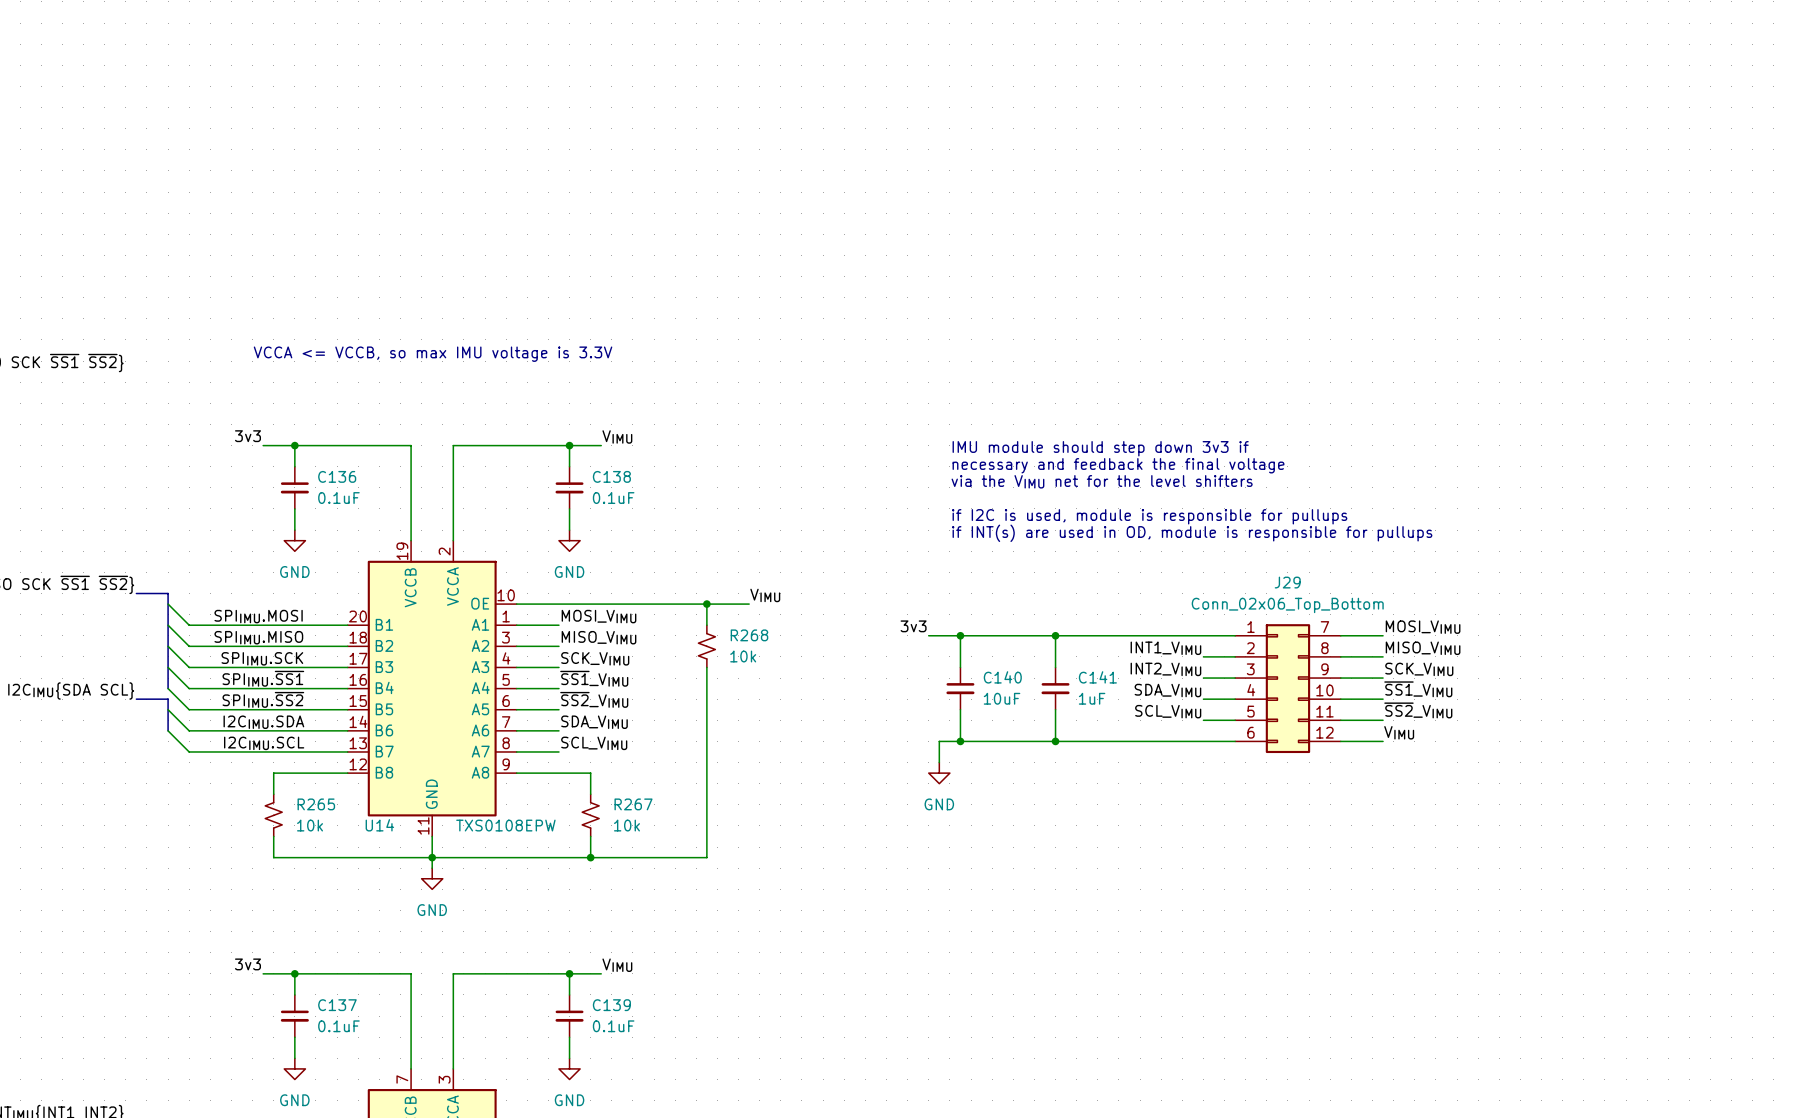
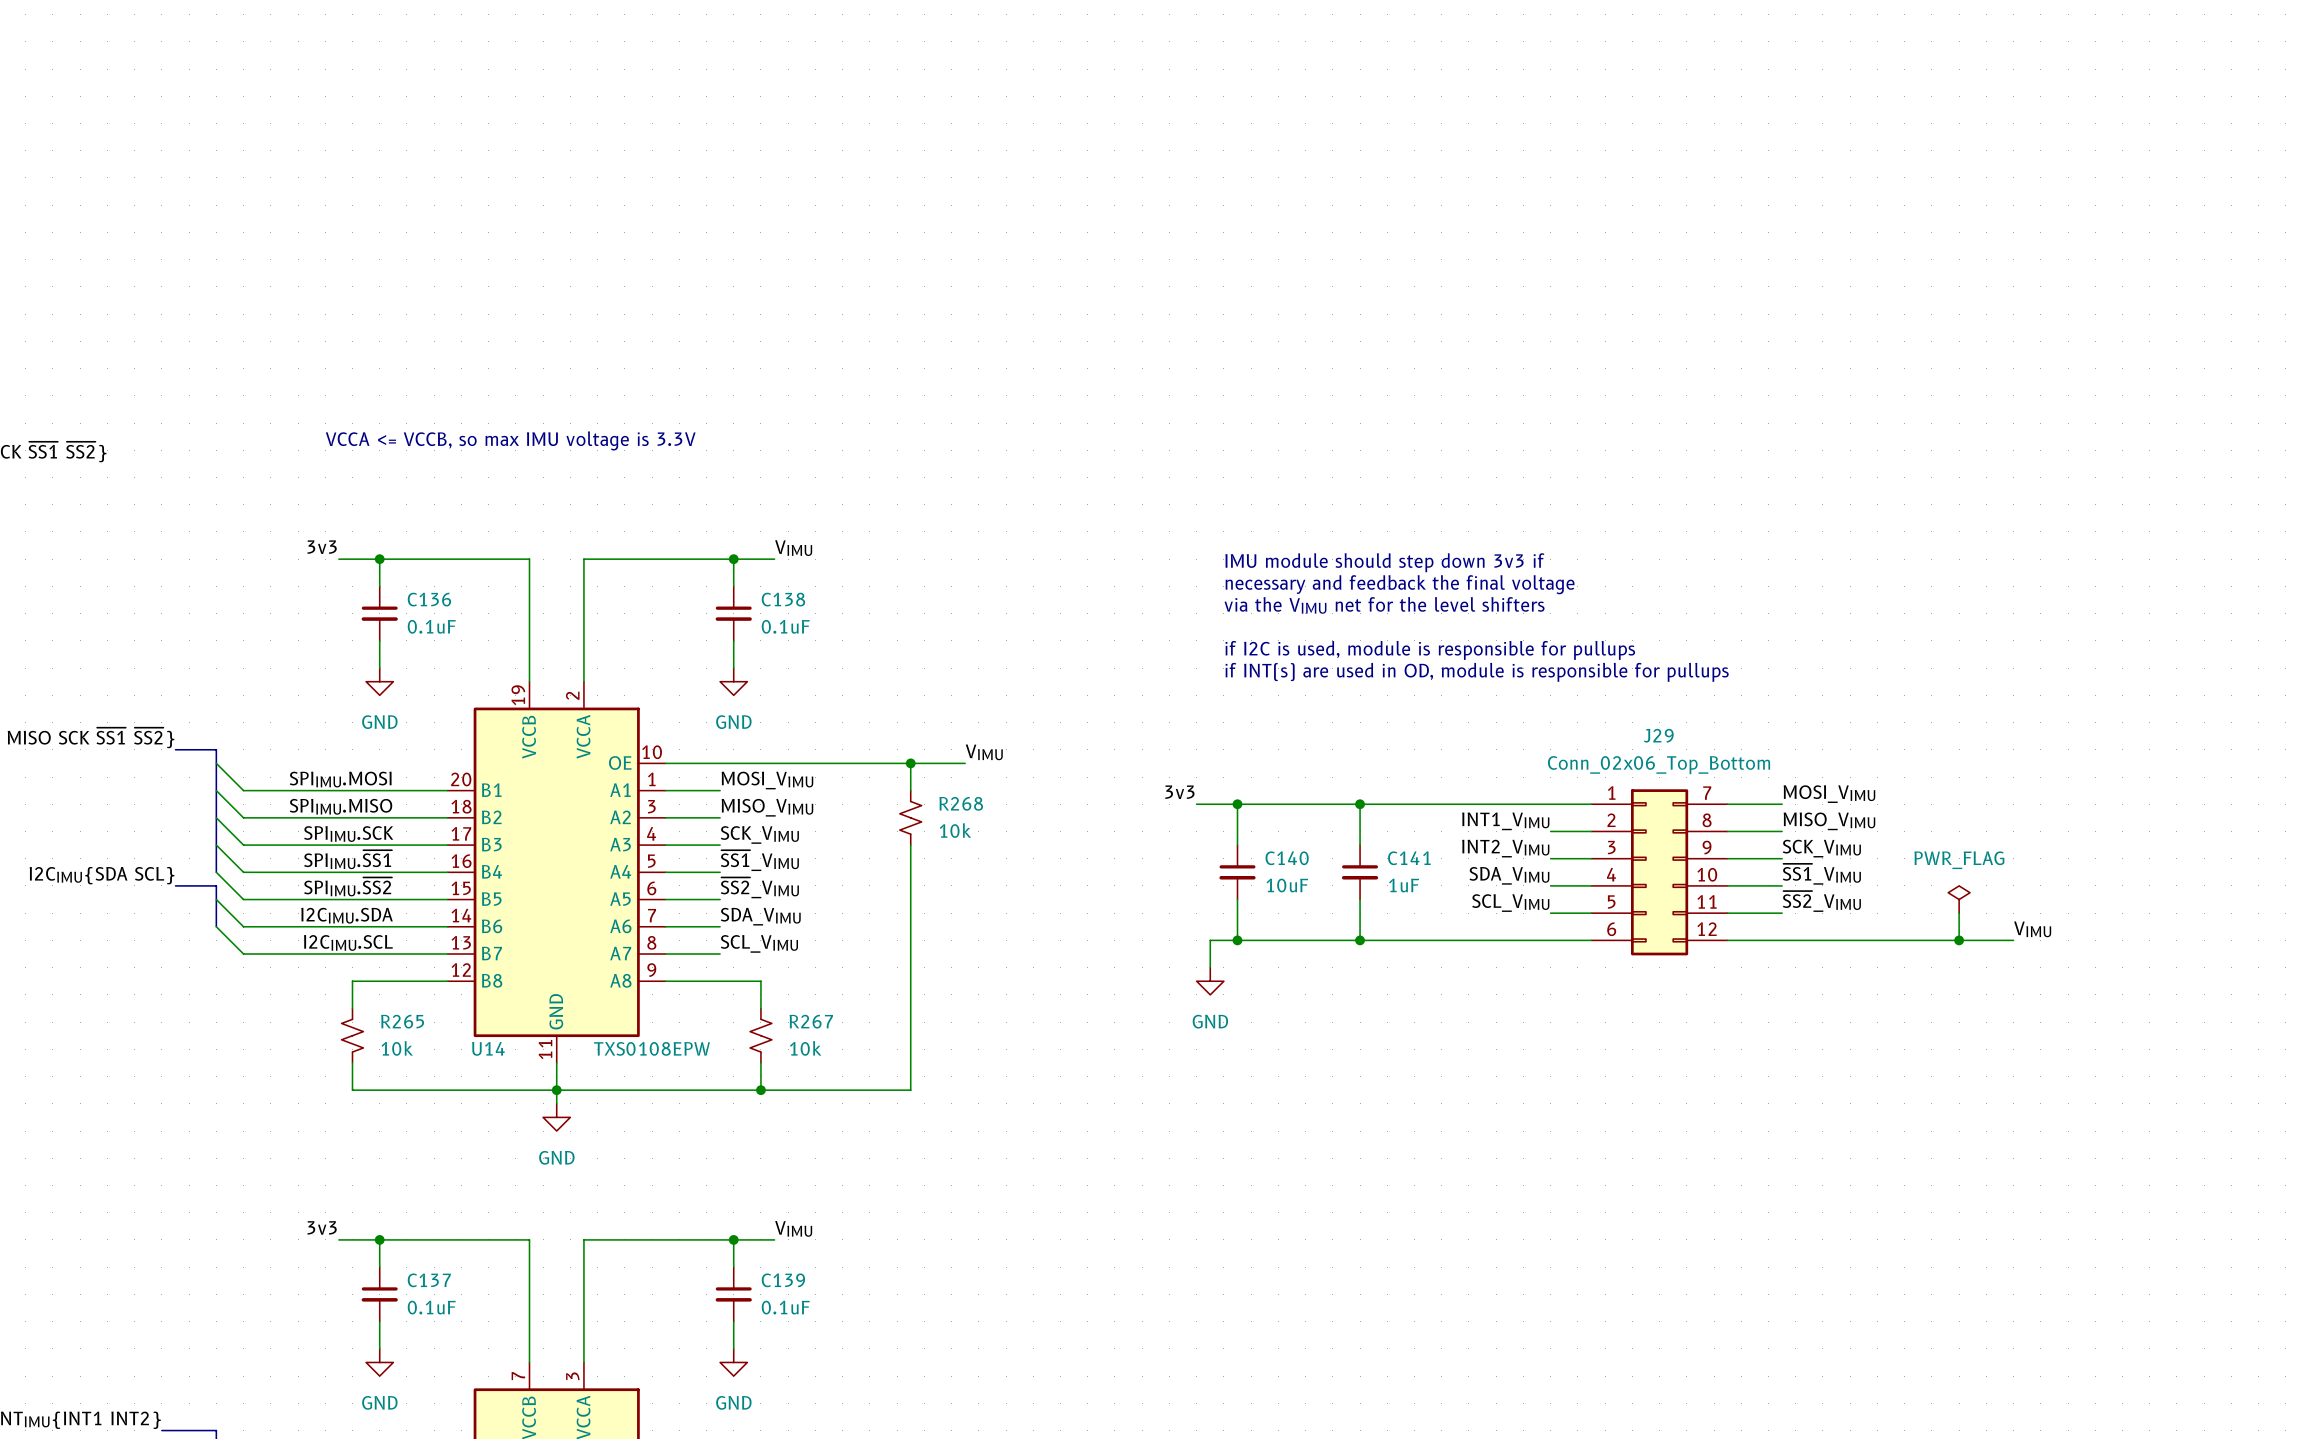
power symbol: none -> PWR_FLAG (1959, 899)
wire: none -> (1959, 913) (1959, 940)
label position: VIMU (1399, 732) -> VIMU (2032, 929)
wire: none -> (1782, 940) (2013, 940)
junction: none -> (1959, 940)

